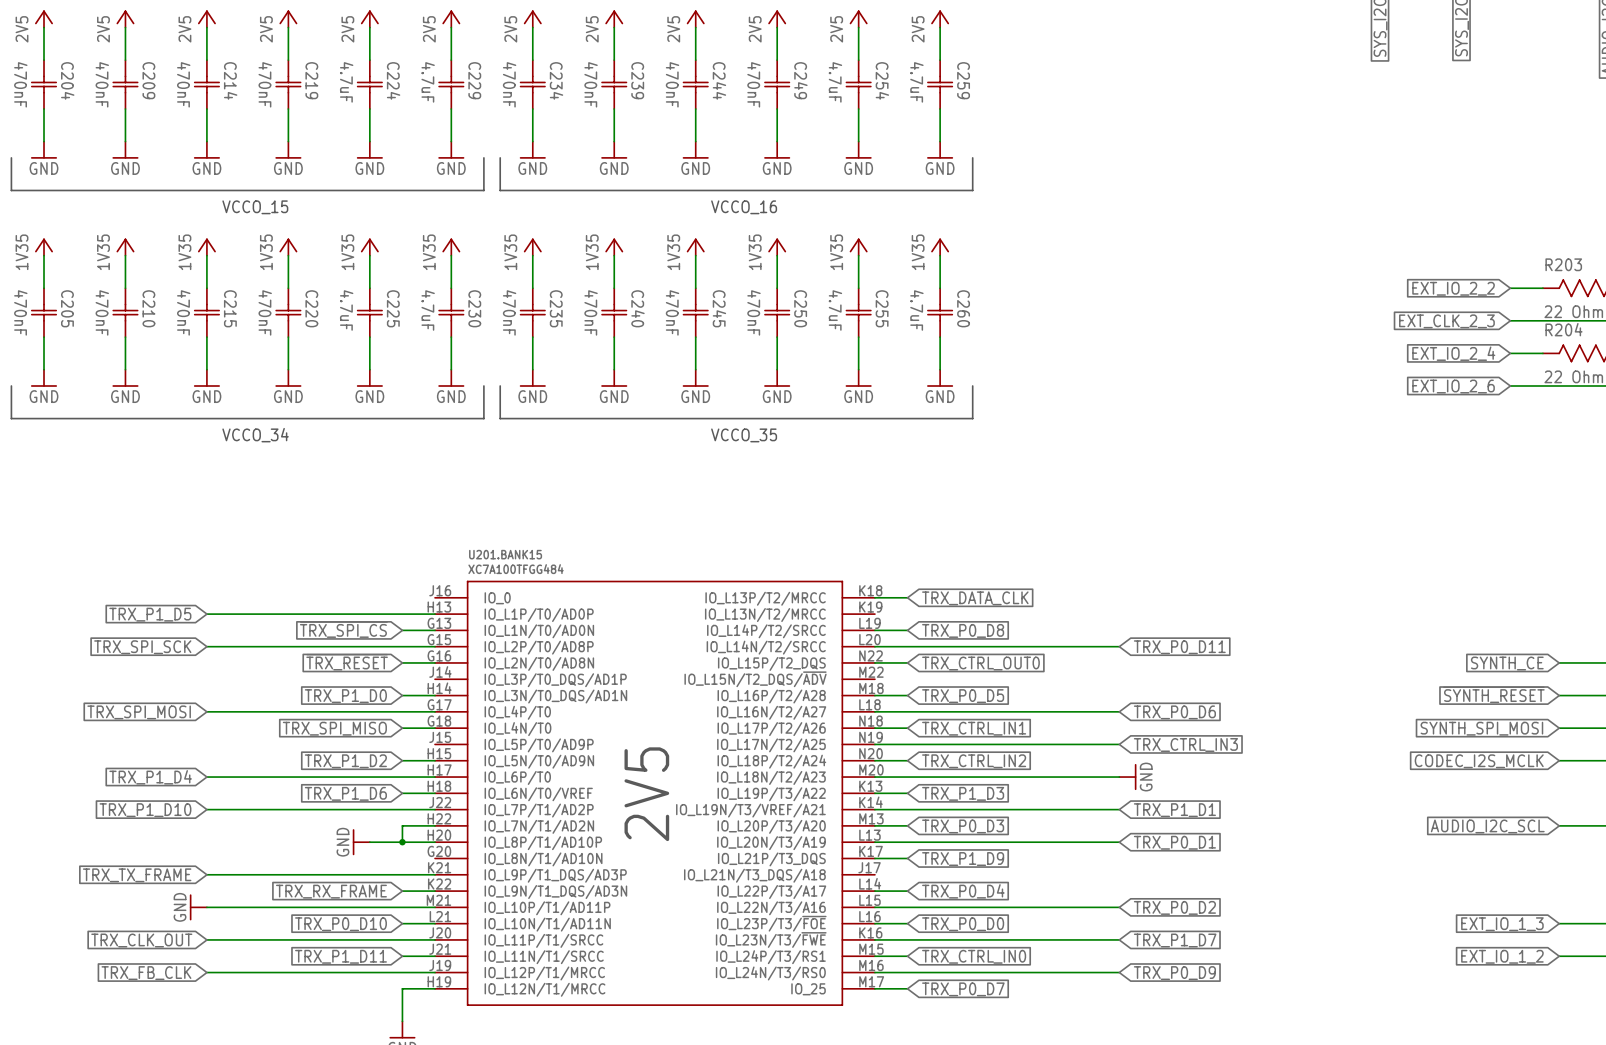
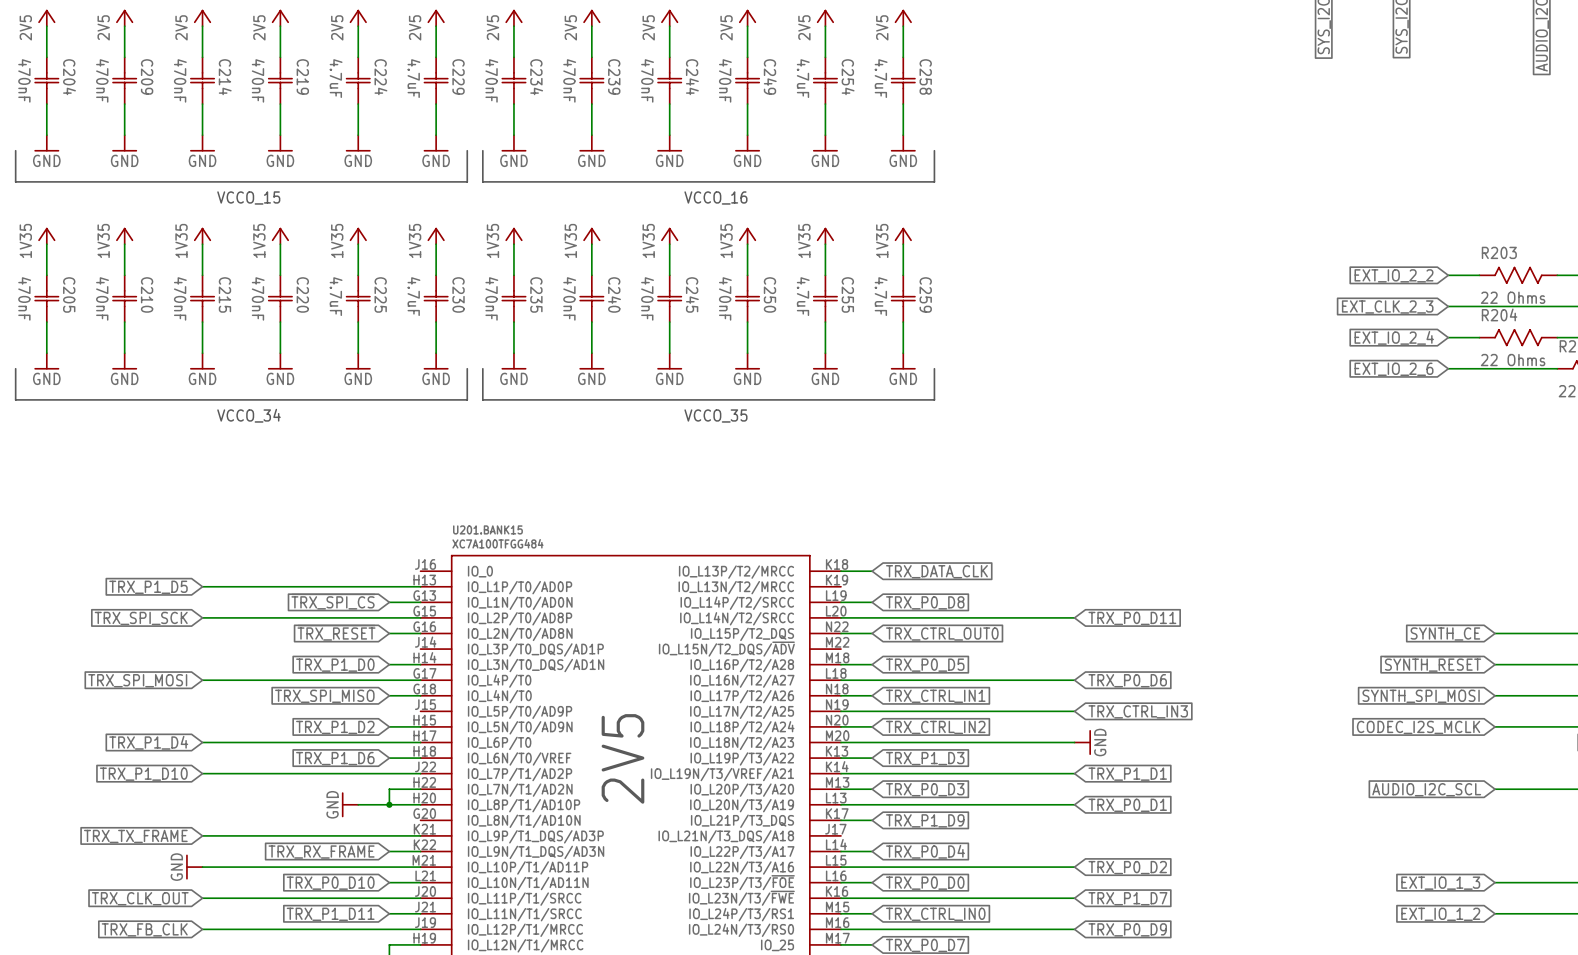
C259 name: C259 (963, 80) -> C258 (925, 76)
C260 name: C260 (963, 308) -> C259 (925, 294)

